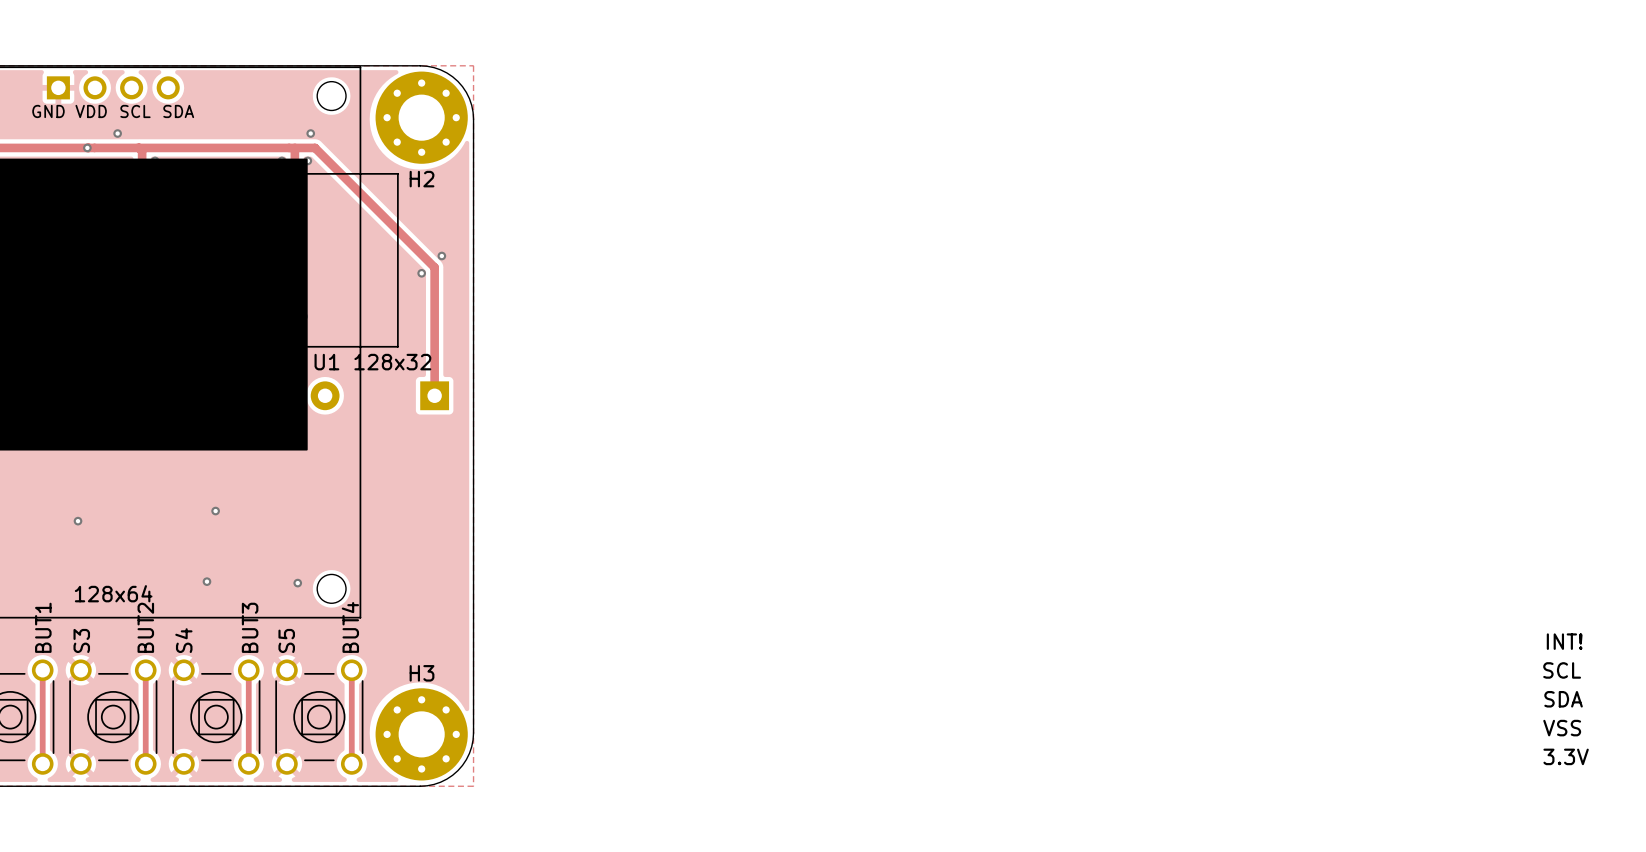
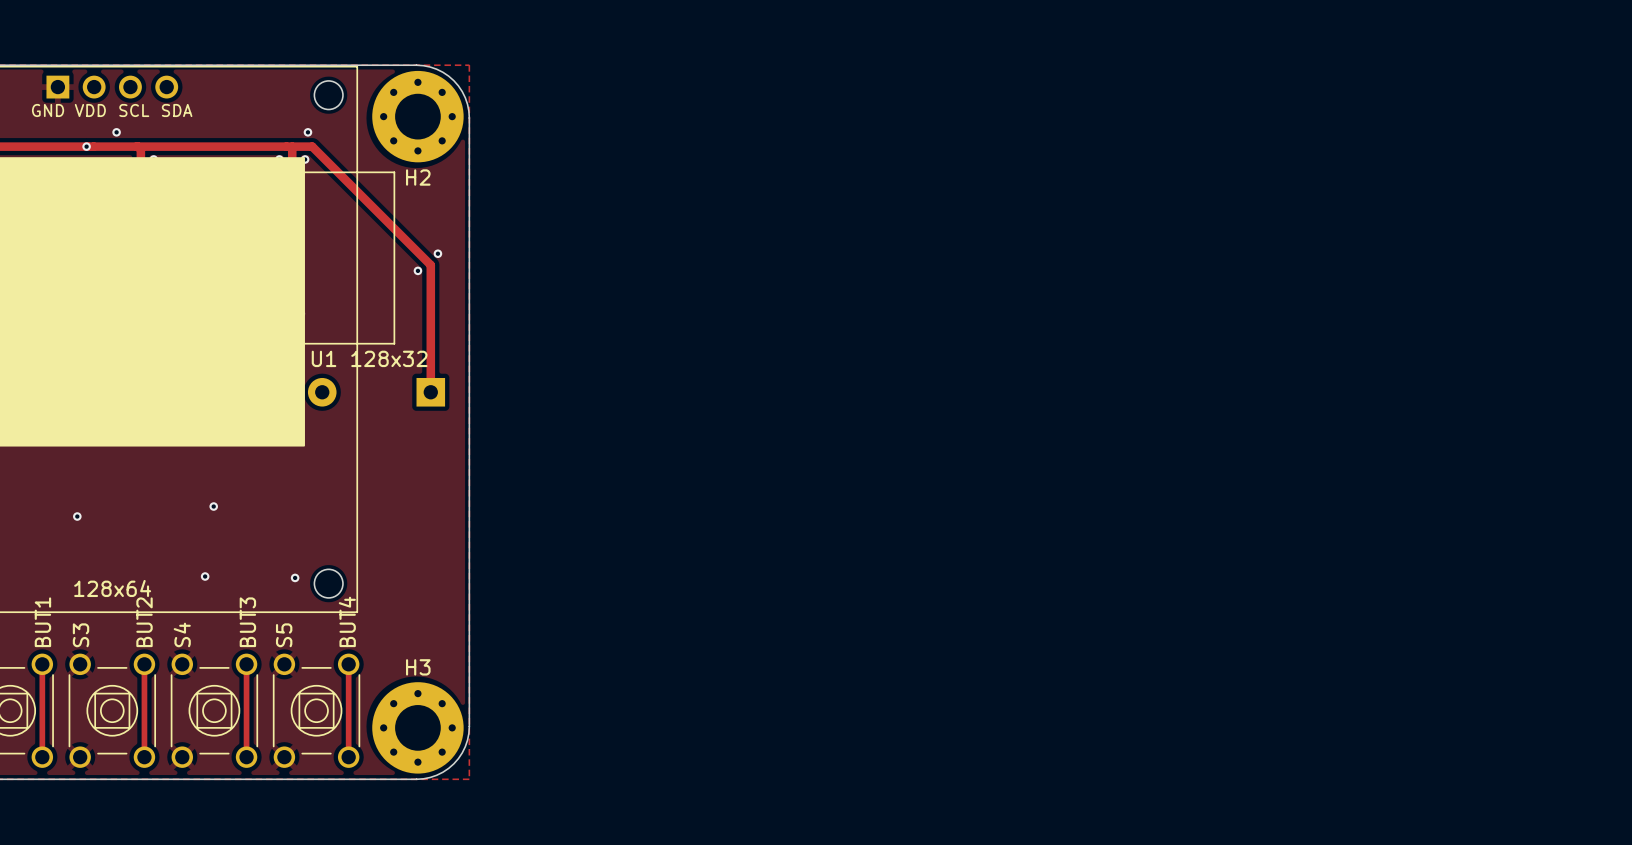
text: INT! (1564, 641) -> none
text: SCL (1562, 670) -> none
text: SDA (1563, 699) -> none
text: VSS (1562, 728) -> none
text: 3.3V (1566, 756) -> none

